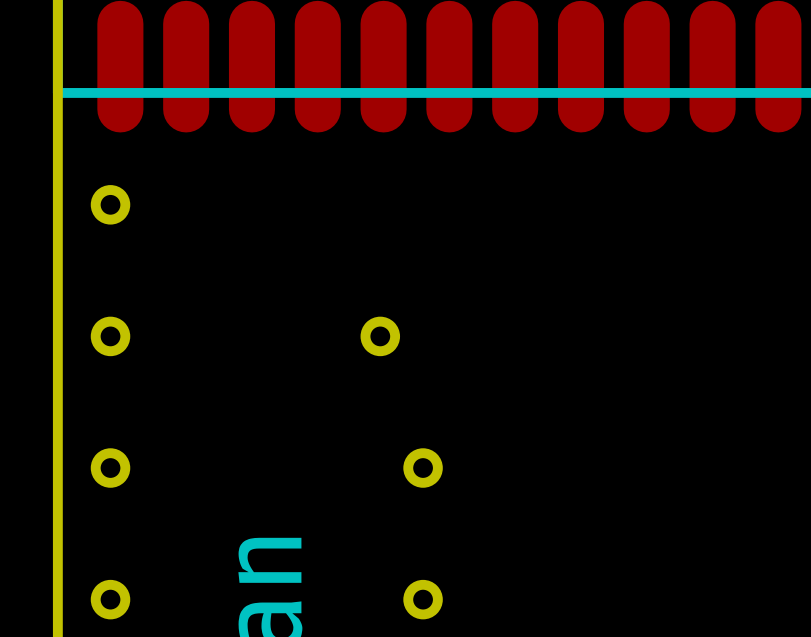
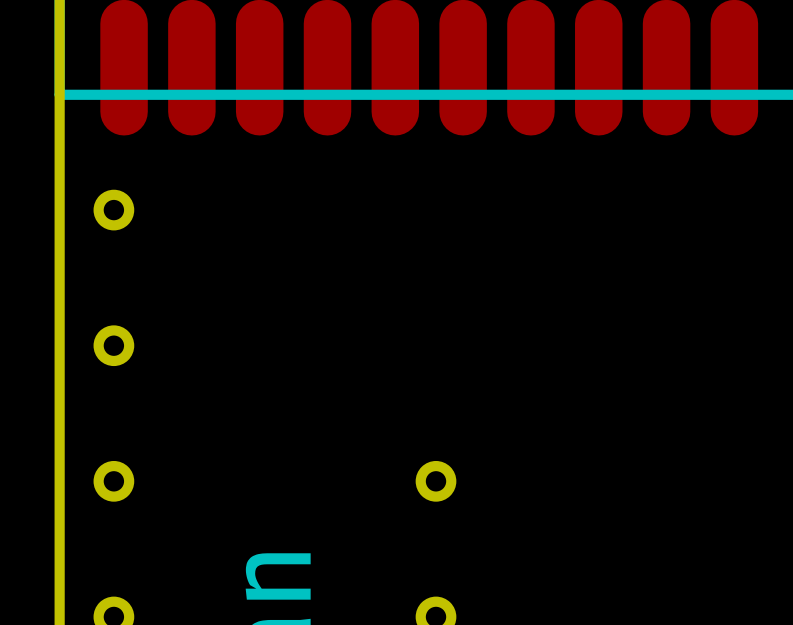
part: (380, 336) -> none

